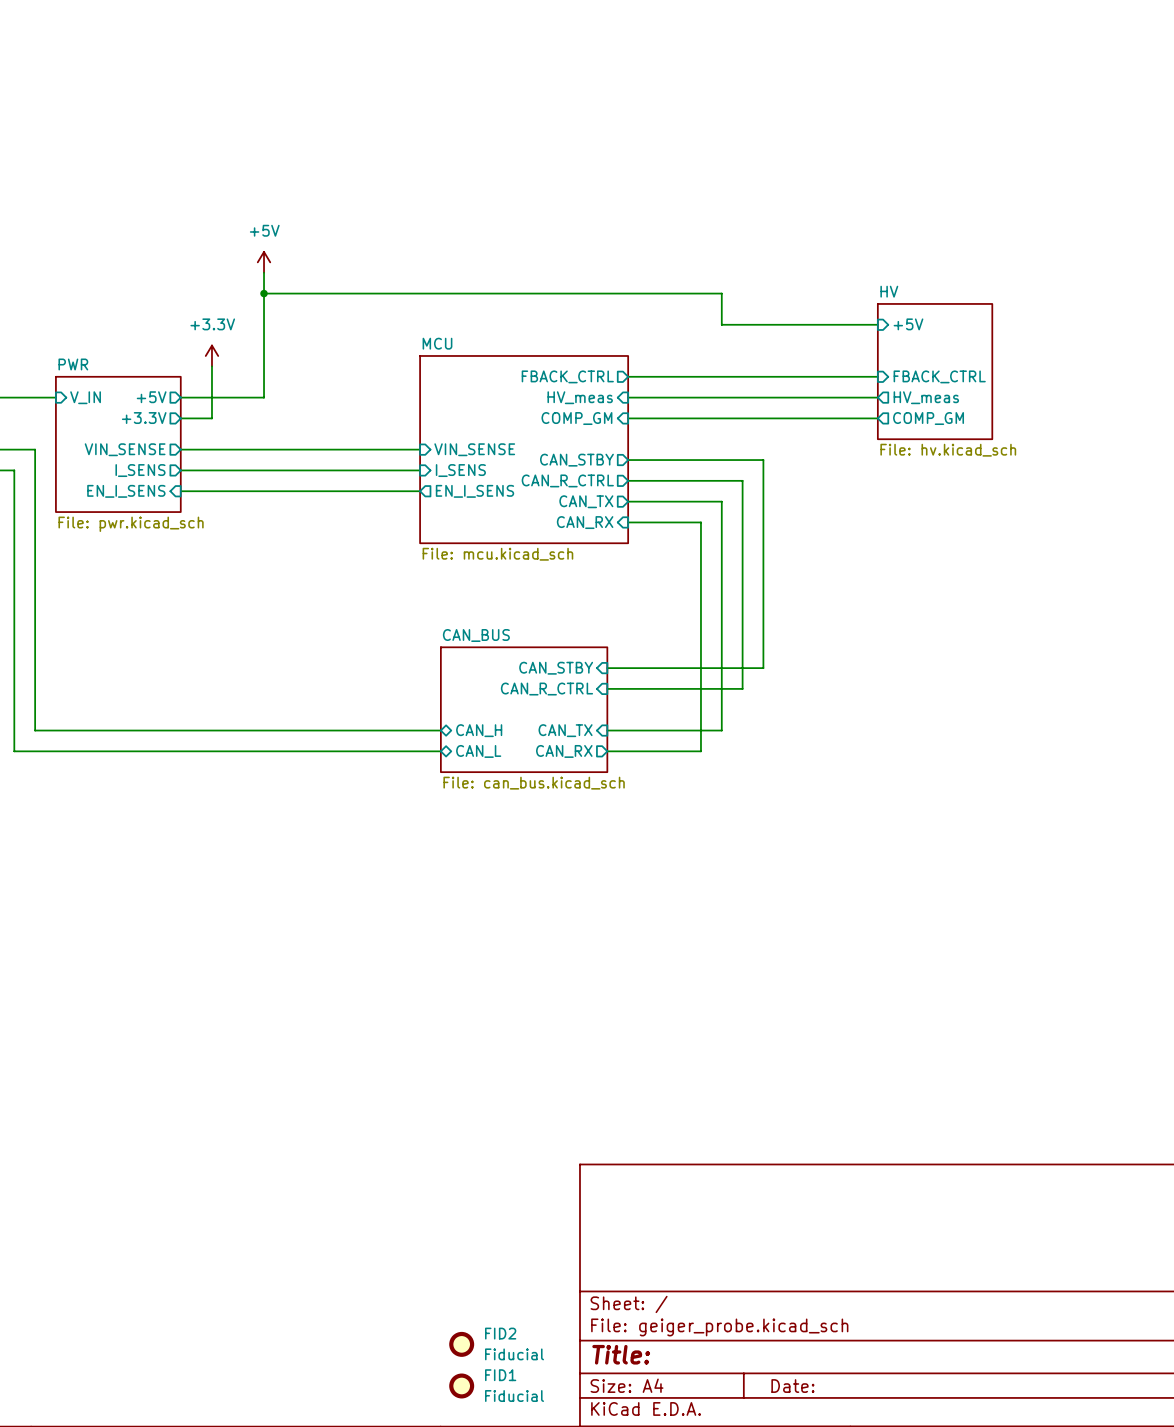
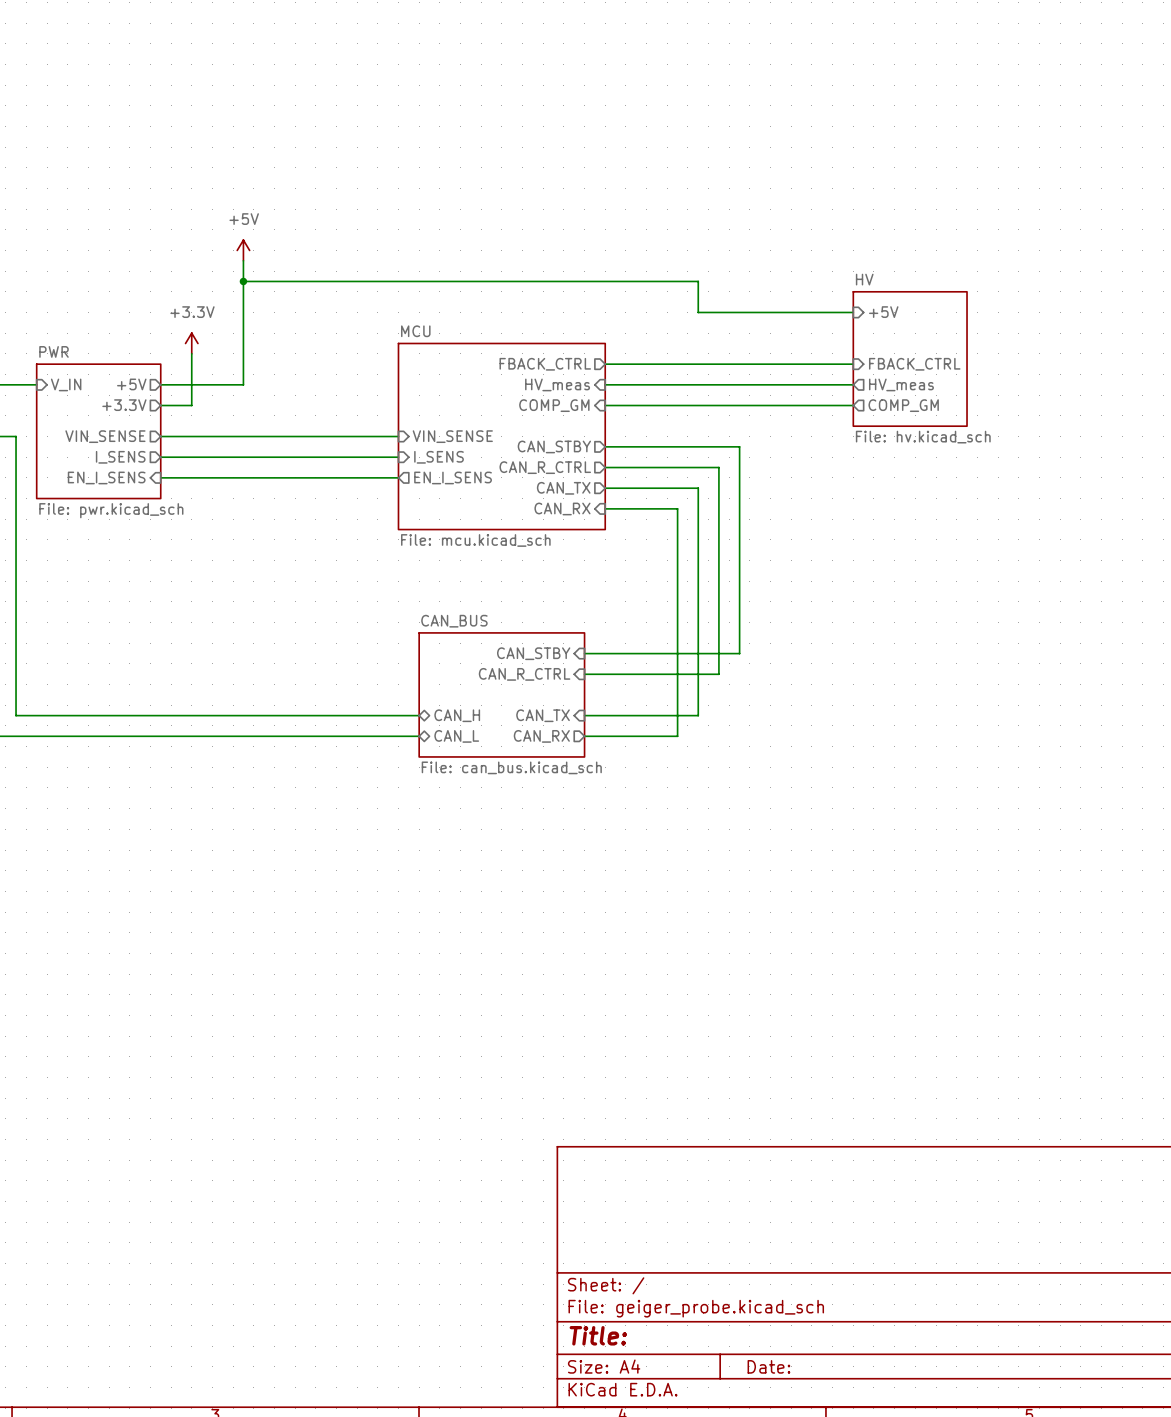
FID2: Fiducial (461, 1344) -> none
FID1: Fiducial (461, 1385) -> none

